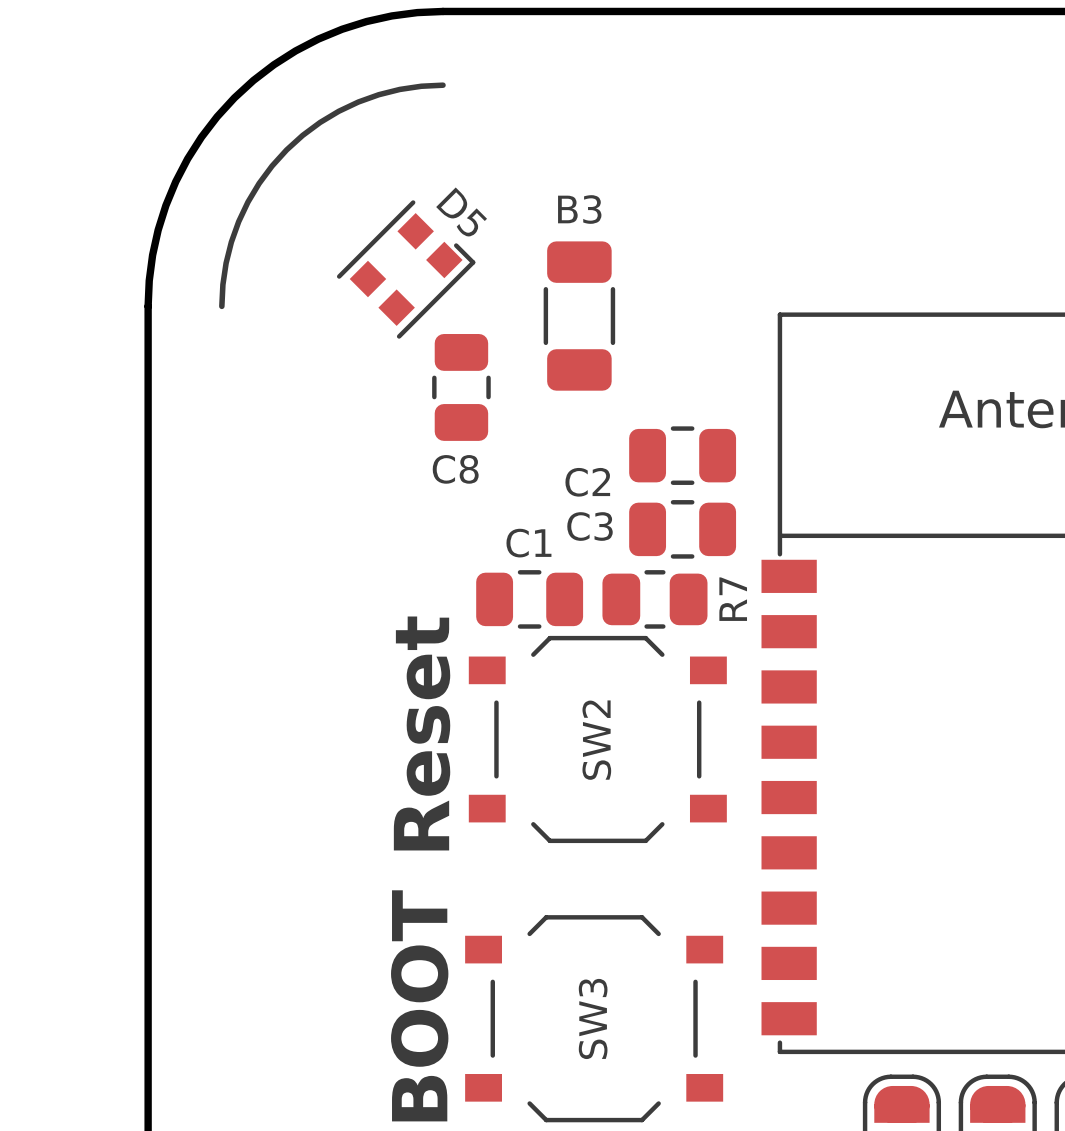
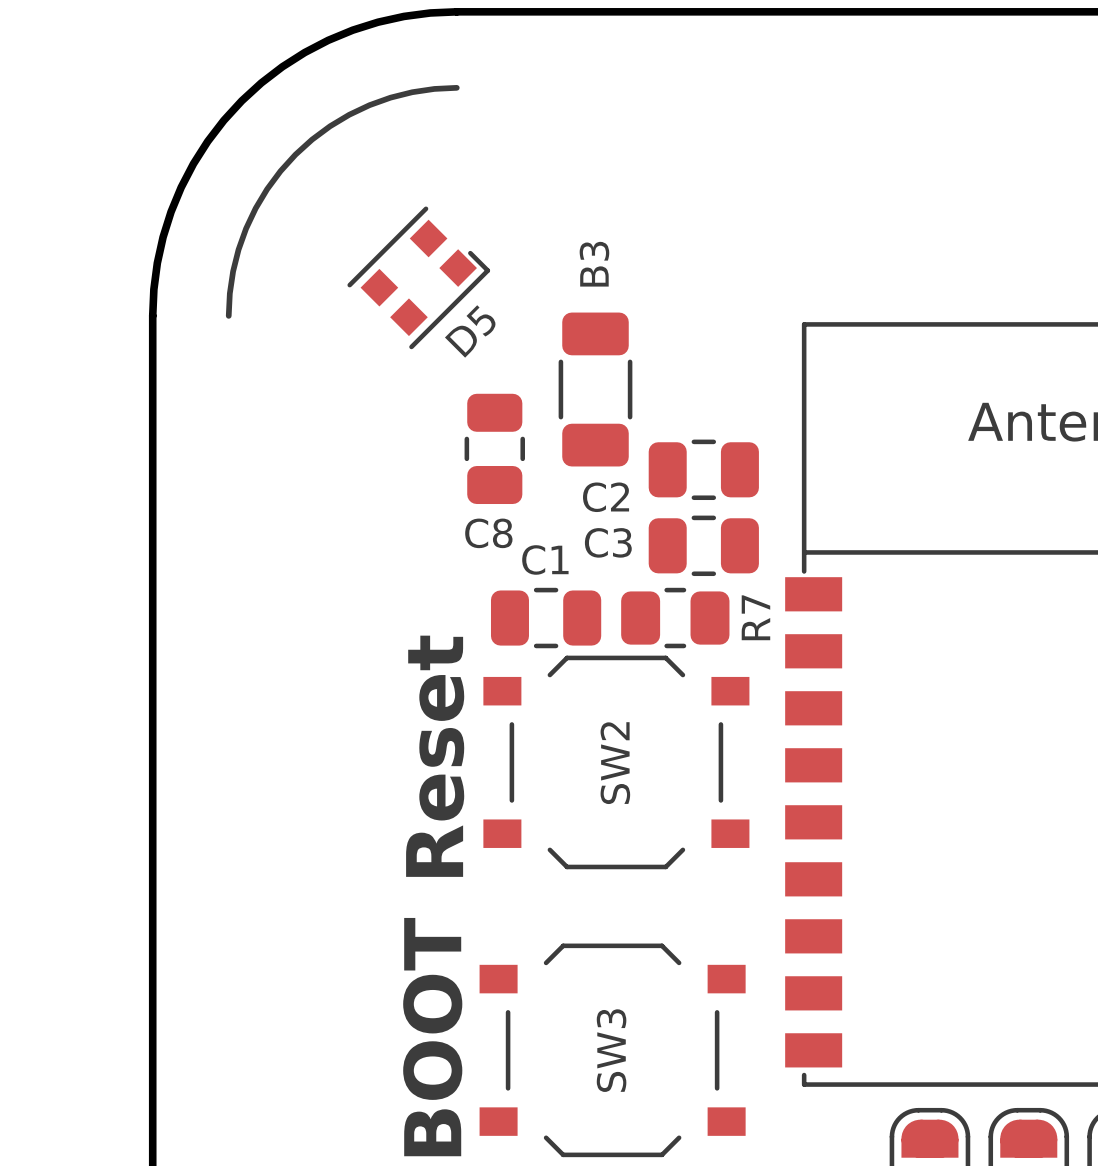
B3 name rotation: 0° (579, 209) -> 90° counterclockwise (594, 264)
D5 name rotation: 0° (461, 212) -> 90° counterclockwise (470, 331)
D5 name position: D5 (461, 212) -> D5 (470, 331)
B3 position: (579, 316) -> (595, 389)
C8 position: (461, 387) -> (494, 448)

